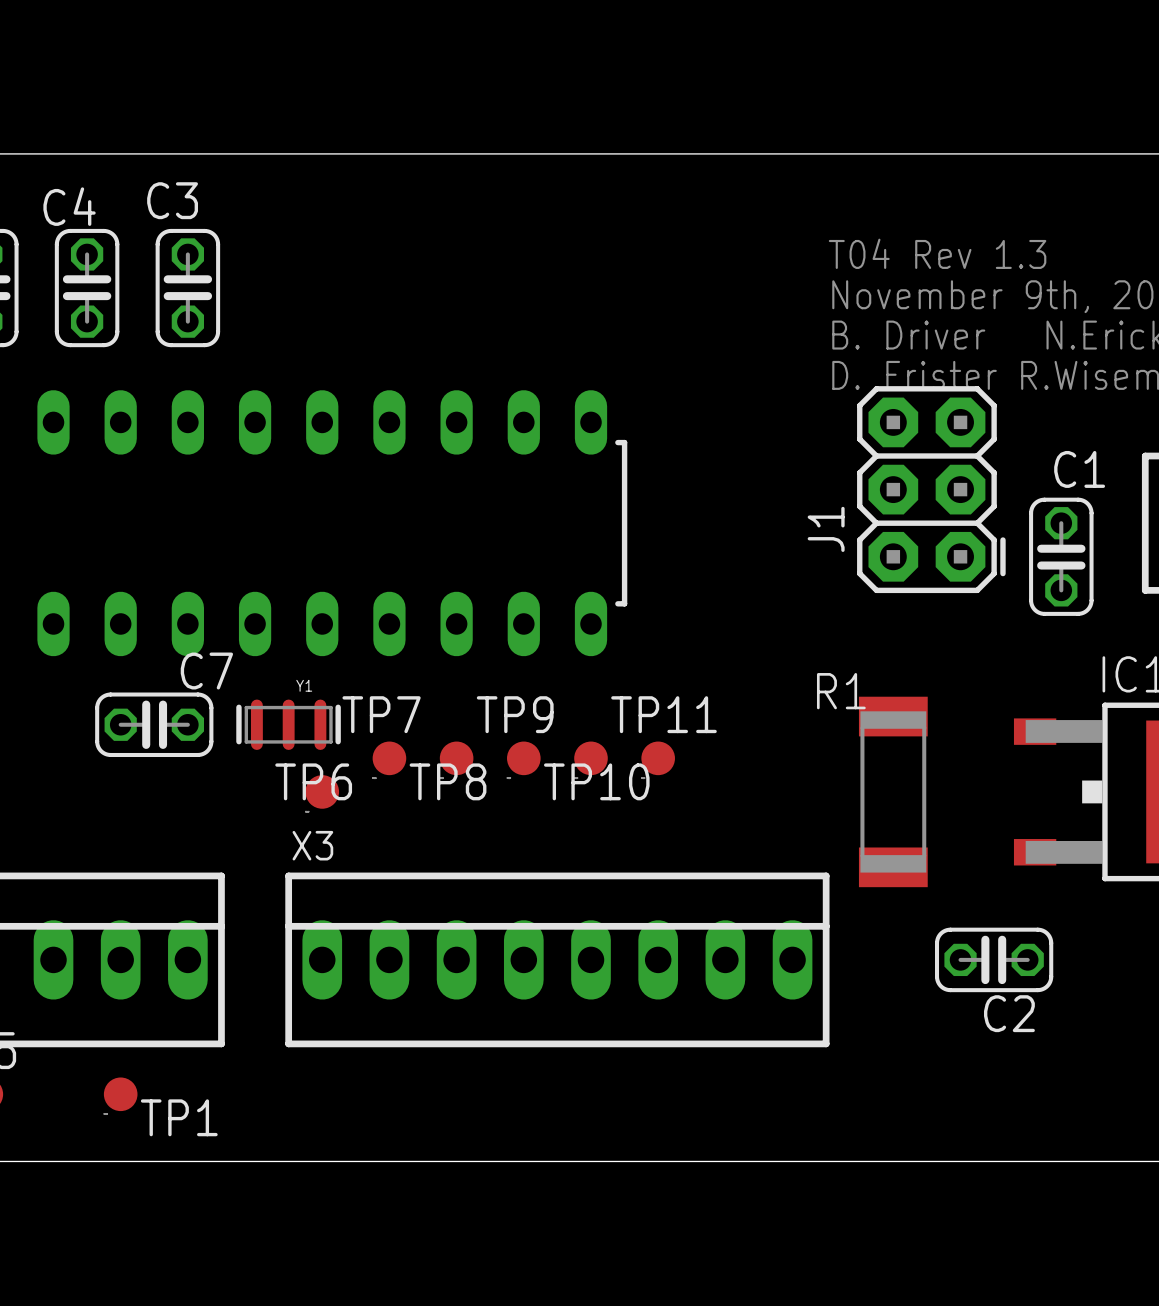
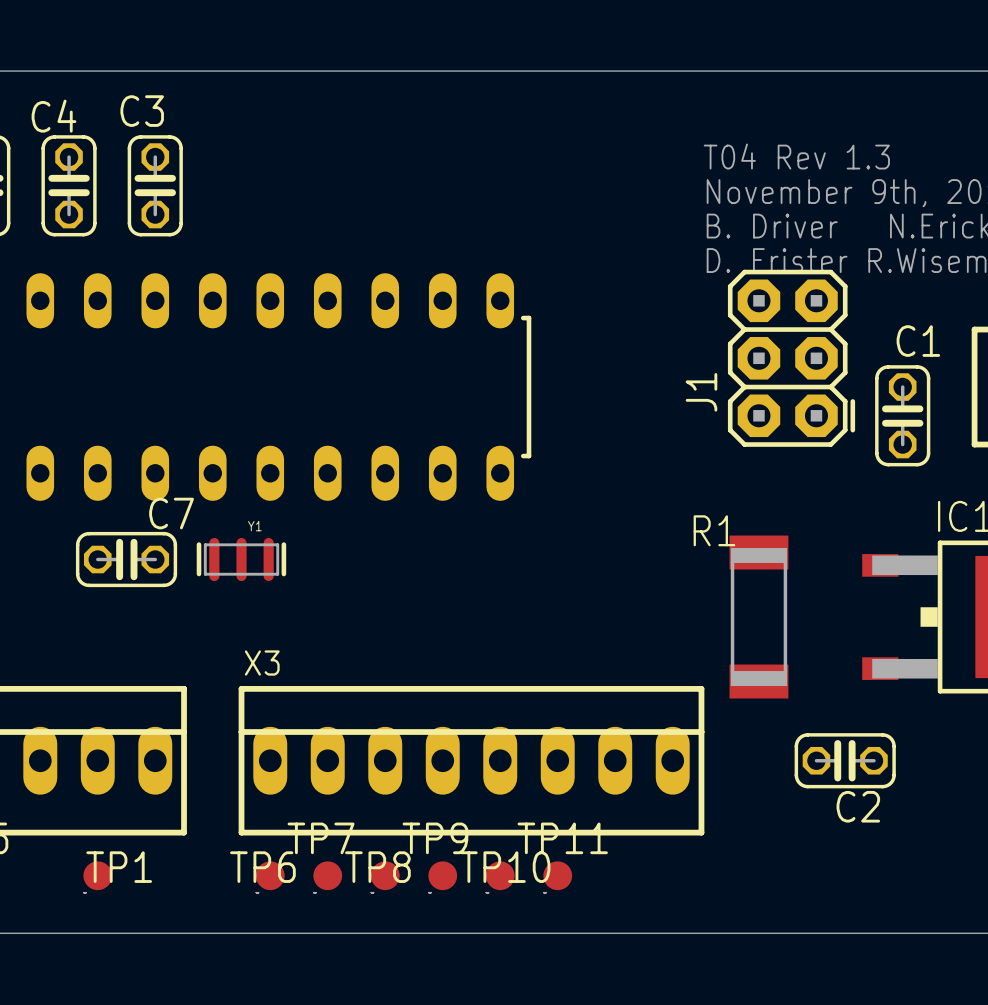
TP7 position: (389, 758) -> (327, 875)
TP8 position: (456, 758) -> (385, 875)
TP9 position: (523, 758) -> (442, 875)
TP10 position: (591, 758) -> (500, 875)
TP11 position: (658, 758) -> (557, 875)
TP8 name position: TP8 (448, 781) -> TP8 (377, 867)
TP10 name position: TP10 (596, 781) -> TP10 (505, 867)
TP6 position: (322, 791) -> (270, 875)
TP1 name position: TP1 (179, 1117) -> TP1 (119, 867)

